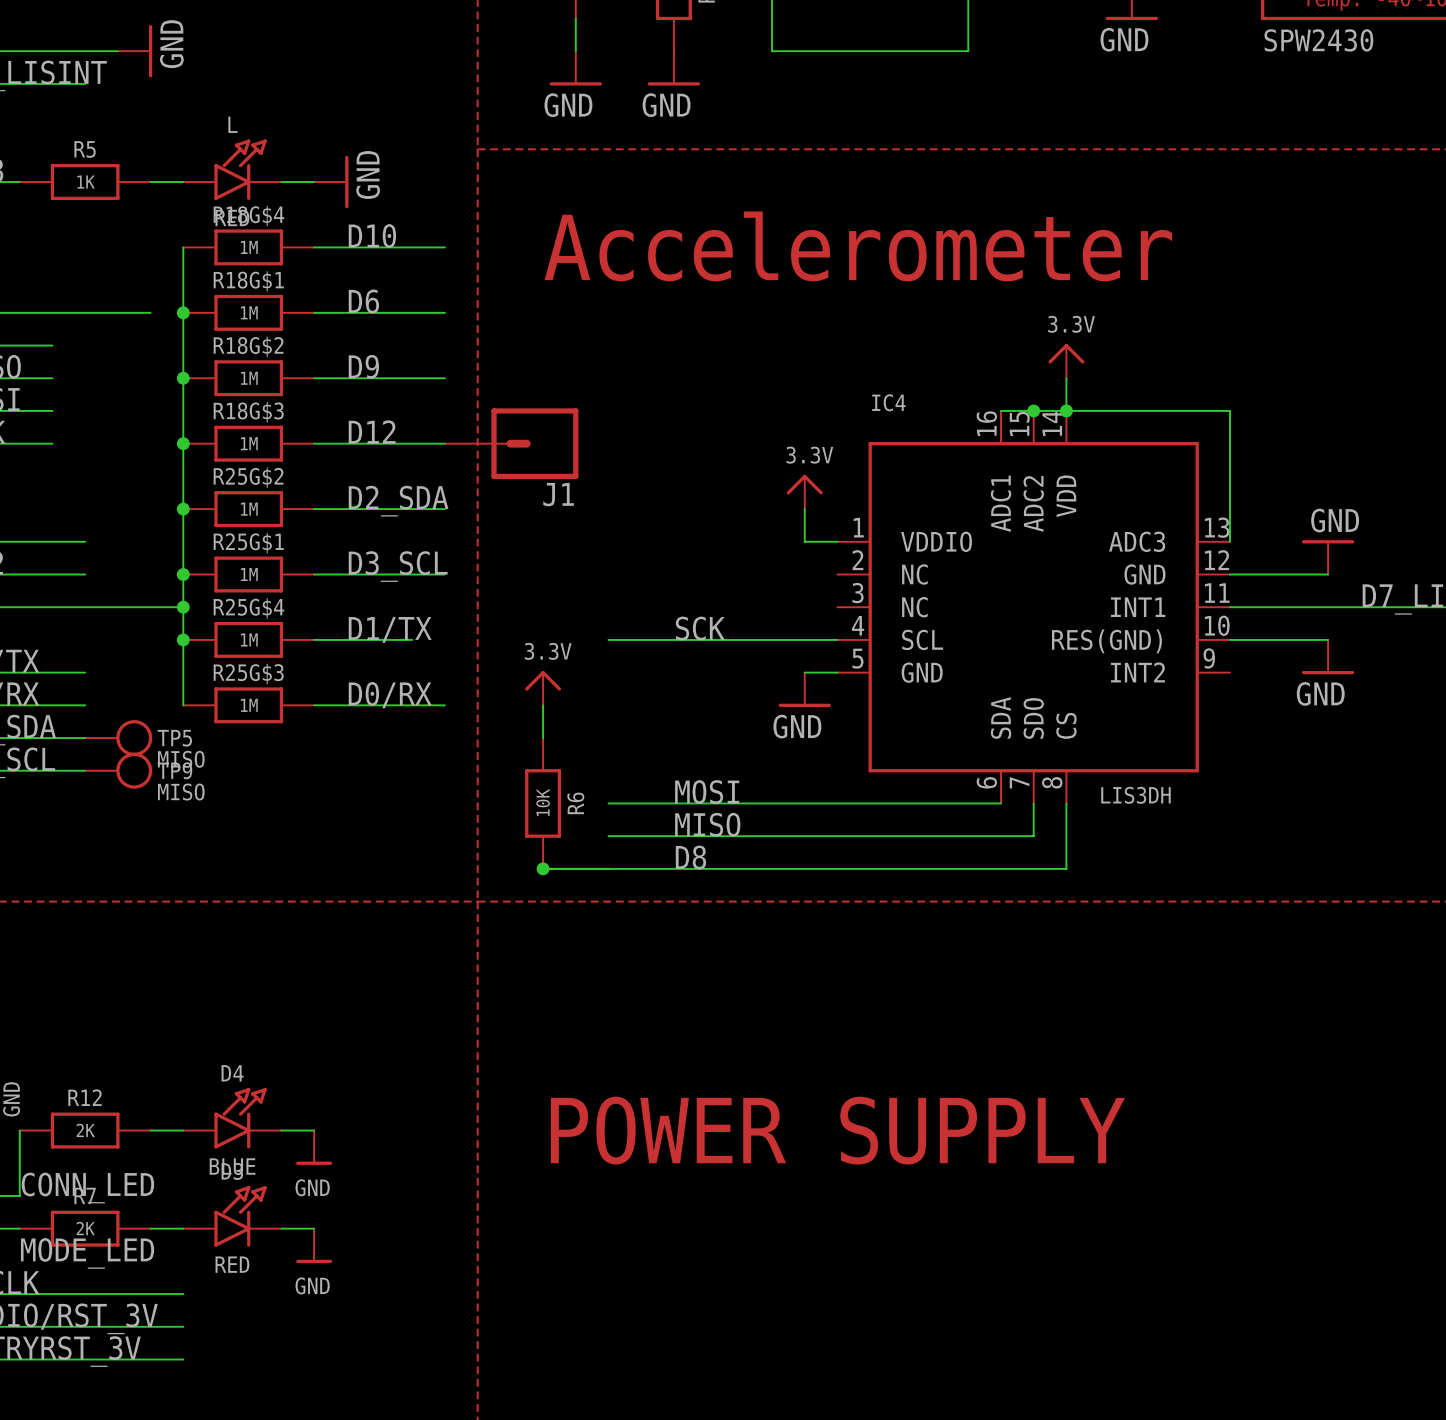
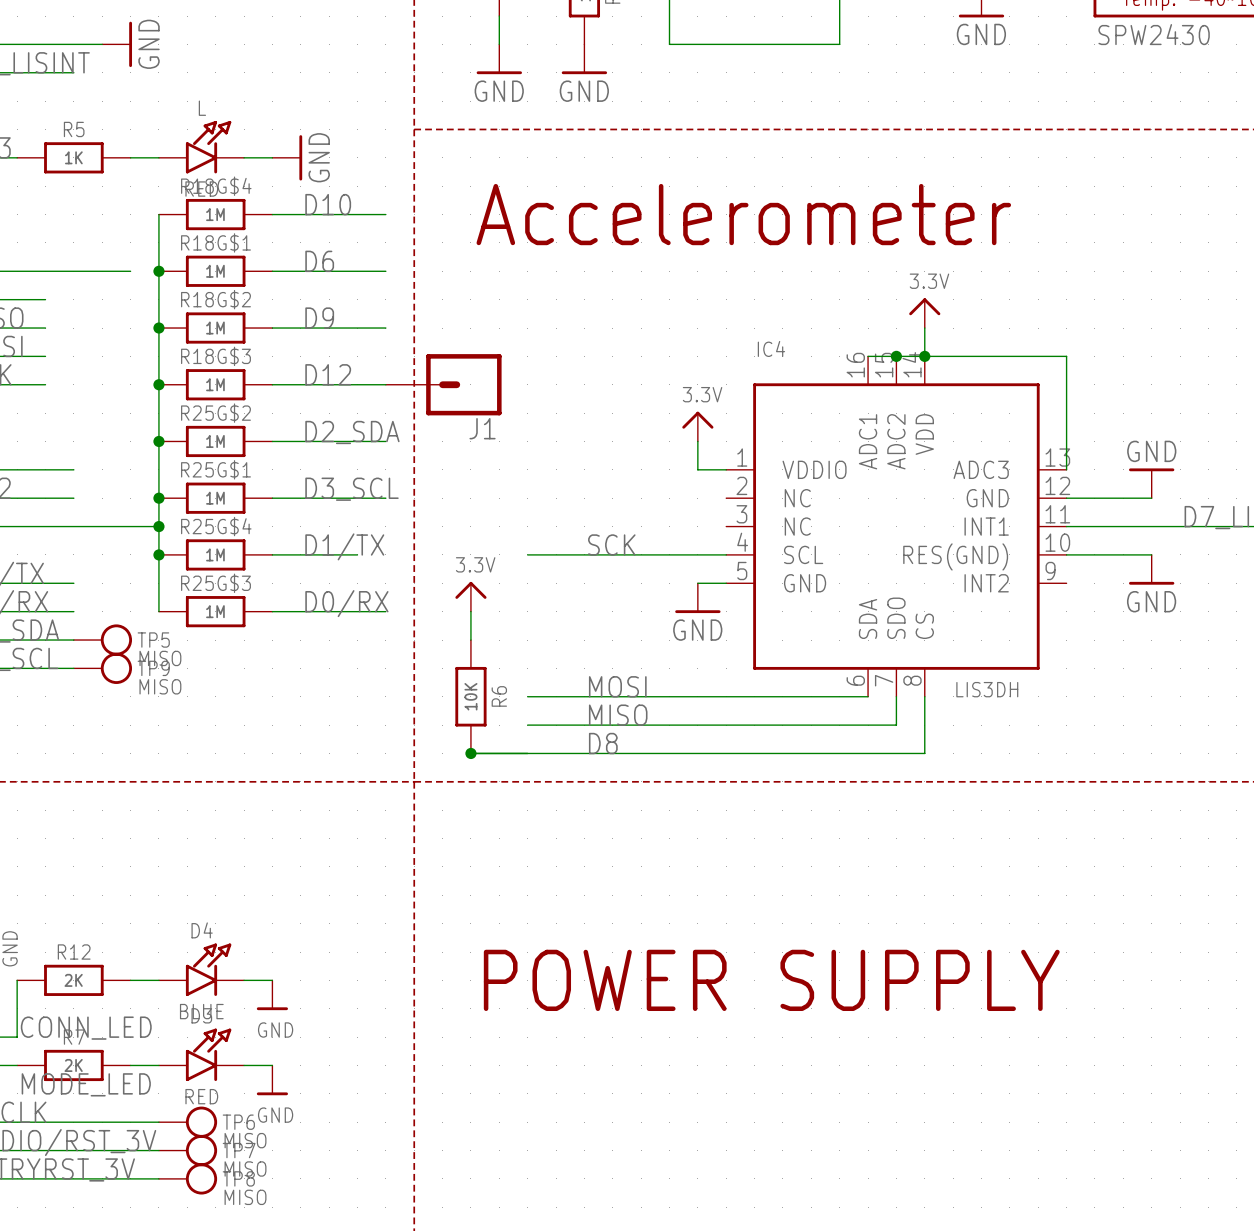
TP6: none -> MISO (188, 1122)
TP7: none -> MISO (188, 1150)
TP8: none -> MISO (188, 1178)

